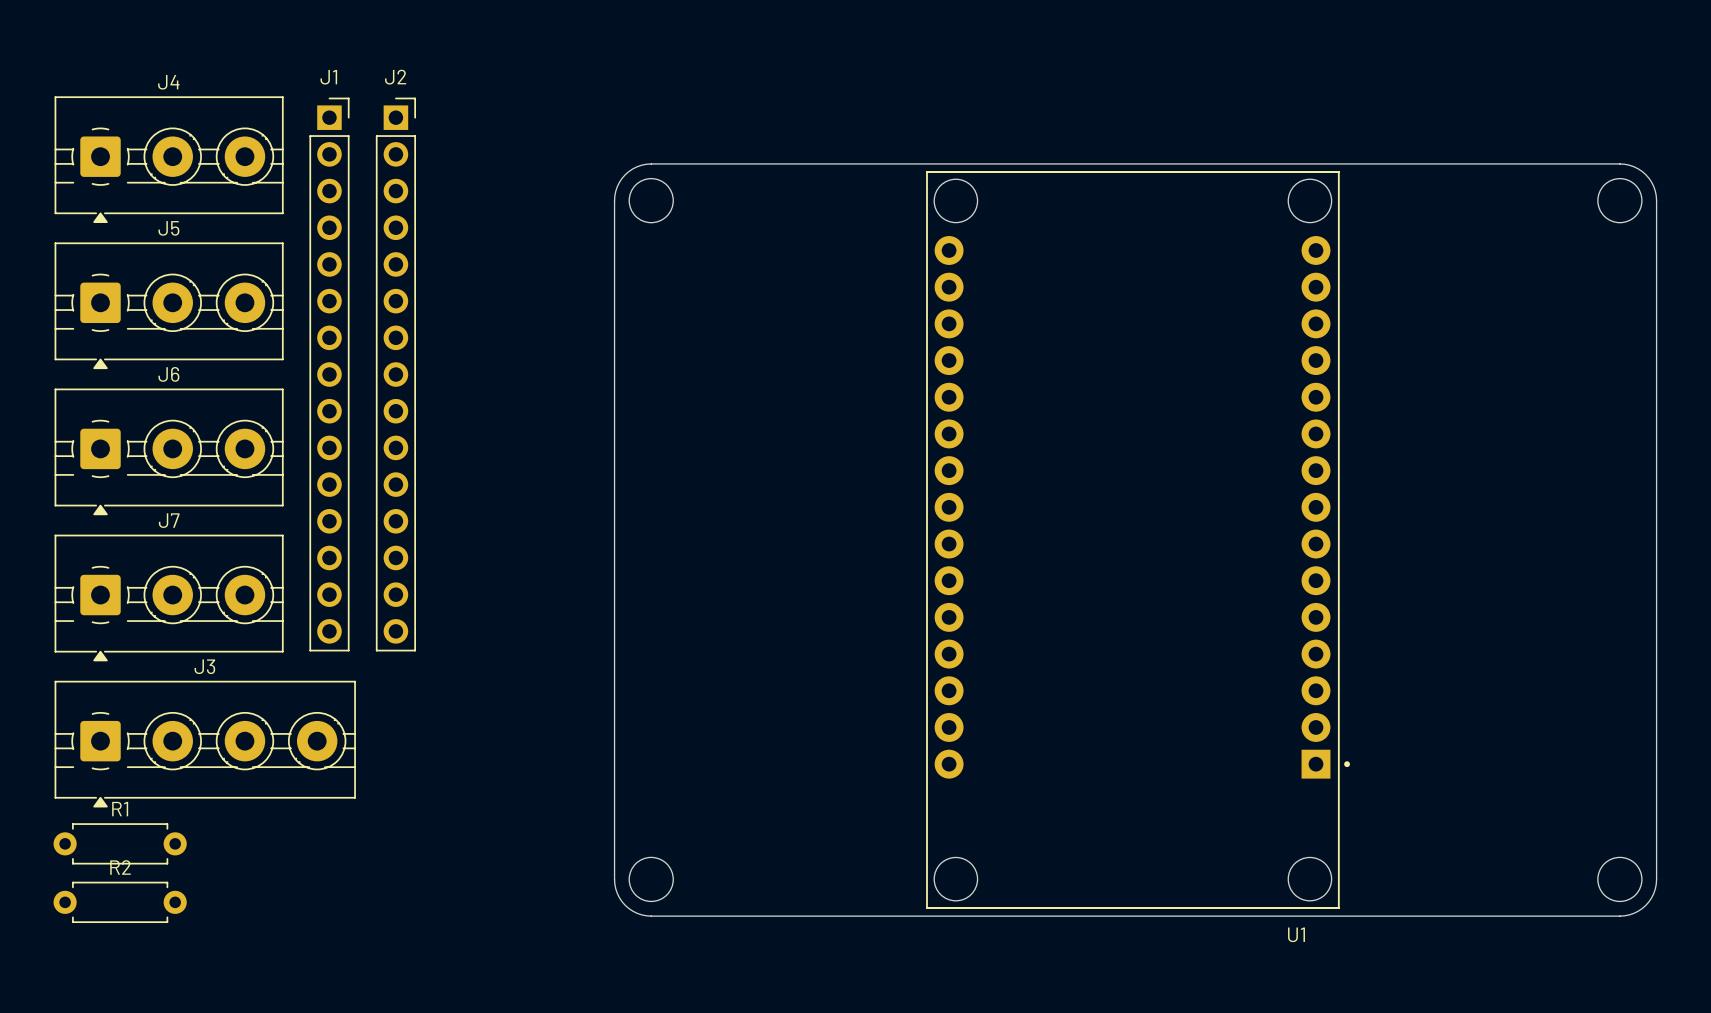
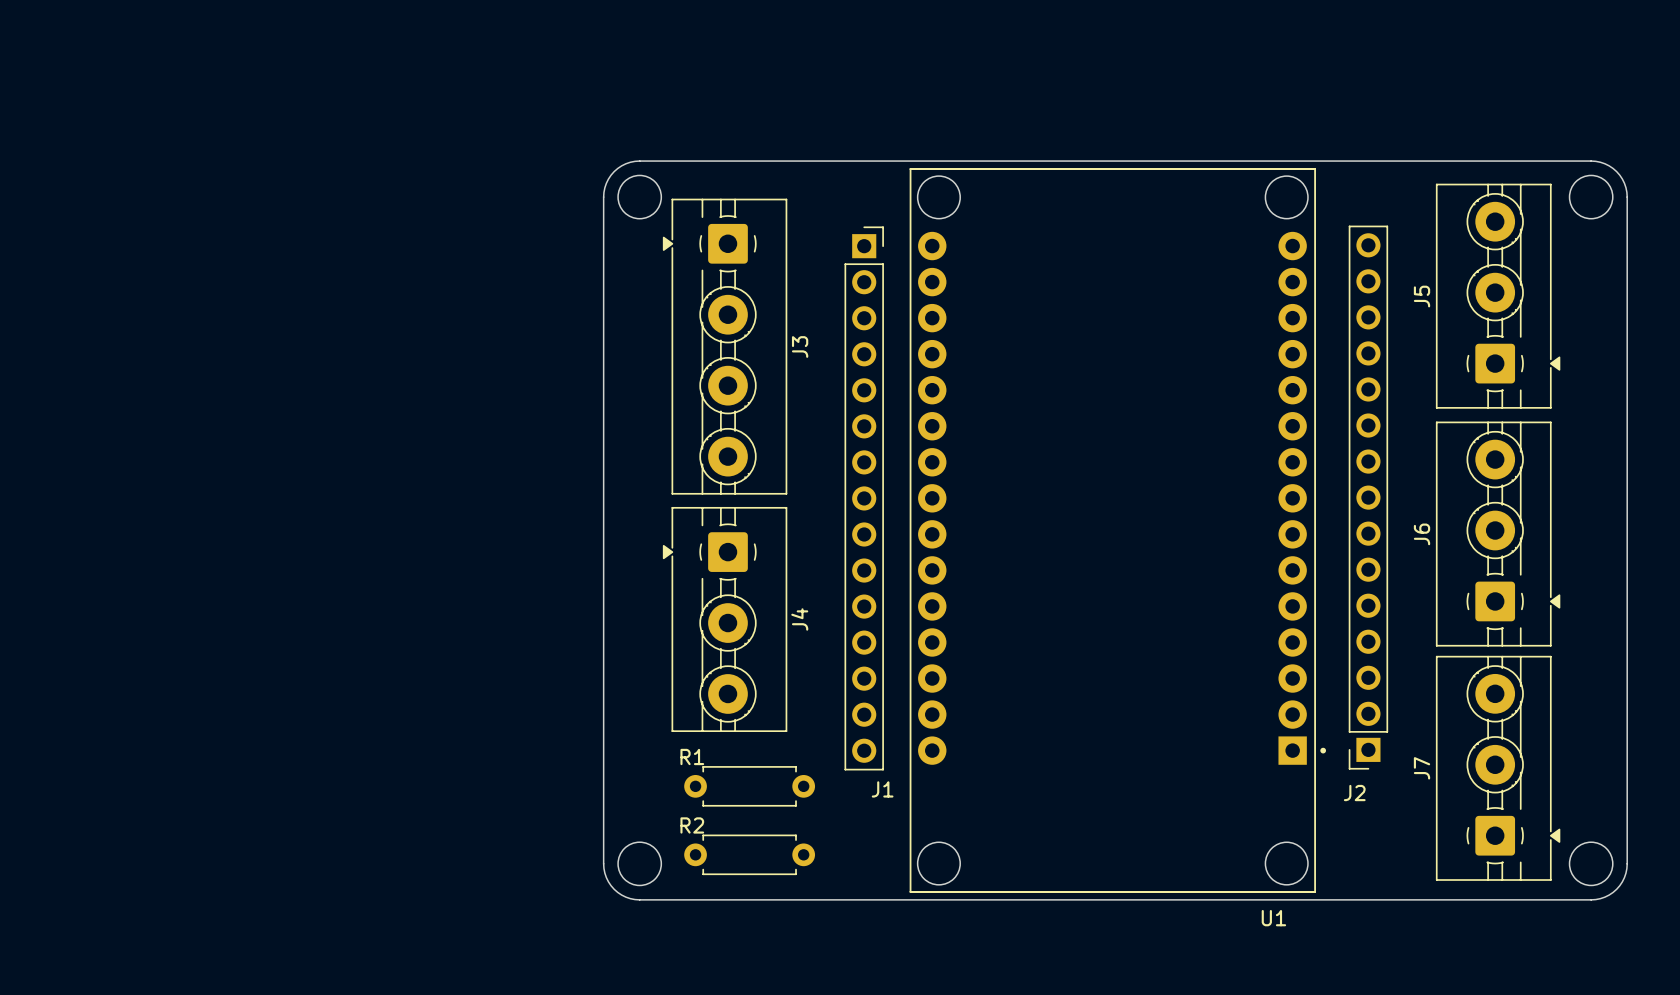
J1 name position: J1 (328, 77) -> J1 (882, 789)
J4 rotation: 0° (169, 159) -> 90° clockwise (725, 619)
J4 position: (169, 159) -> (725, 619)
J5 rotation: 0° (169, 305) -> 90° counterclockwise (1498, 296)
J5 position: (169, 305) -> (1498, 296)
J1 position: (329, 374) -> (864, 498)
J2 rotation: 0° (395, 374) -> 180° (1368, 497)
J2 position: (395, 374) -> (1368, 497)
J6 rotation: 0° (169, 451) -> 90° counterclockwise (1498, 534)
J6 position: (169, 451) -> (1498, 534)
J7 rotation: 0° (169, 597) -> 90° counterclockwise (1498, 768)
J7 position: (169, 597) -> (1498, 768)
J3 rotation: 0° (205, 744) -> 90° clockwise (725, 346)
J3 position: (205, 744) -> (725, 346)
R1 name position: R1 (120, 809) -> R1 (692, 756)
R1 position: (120, 843) -> (749, 786)
R2 name position: R2 (120, 867) -> R2 (692, 825)
R2 position: (120, 902) -> (749, 854)

